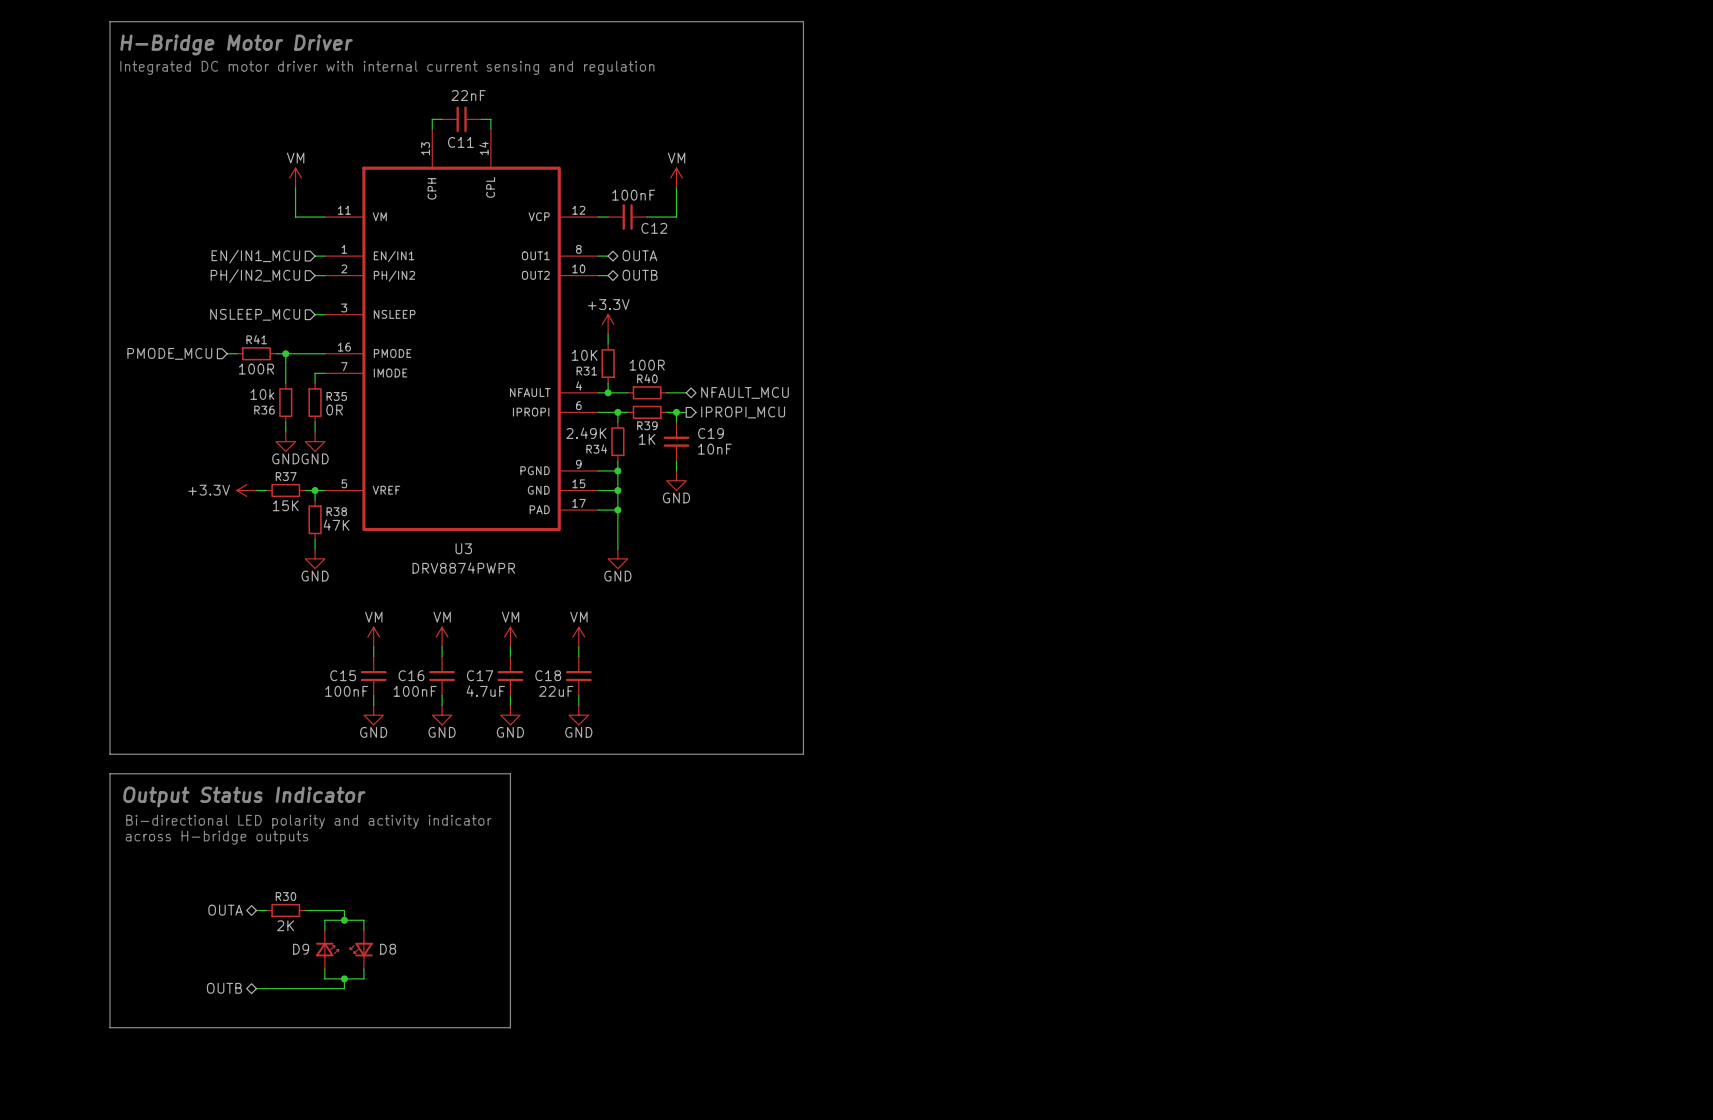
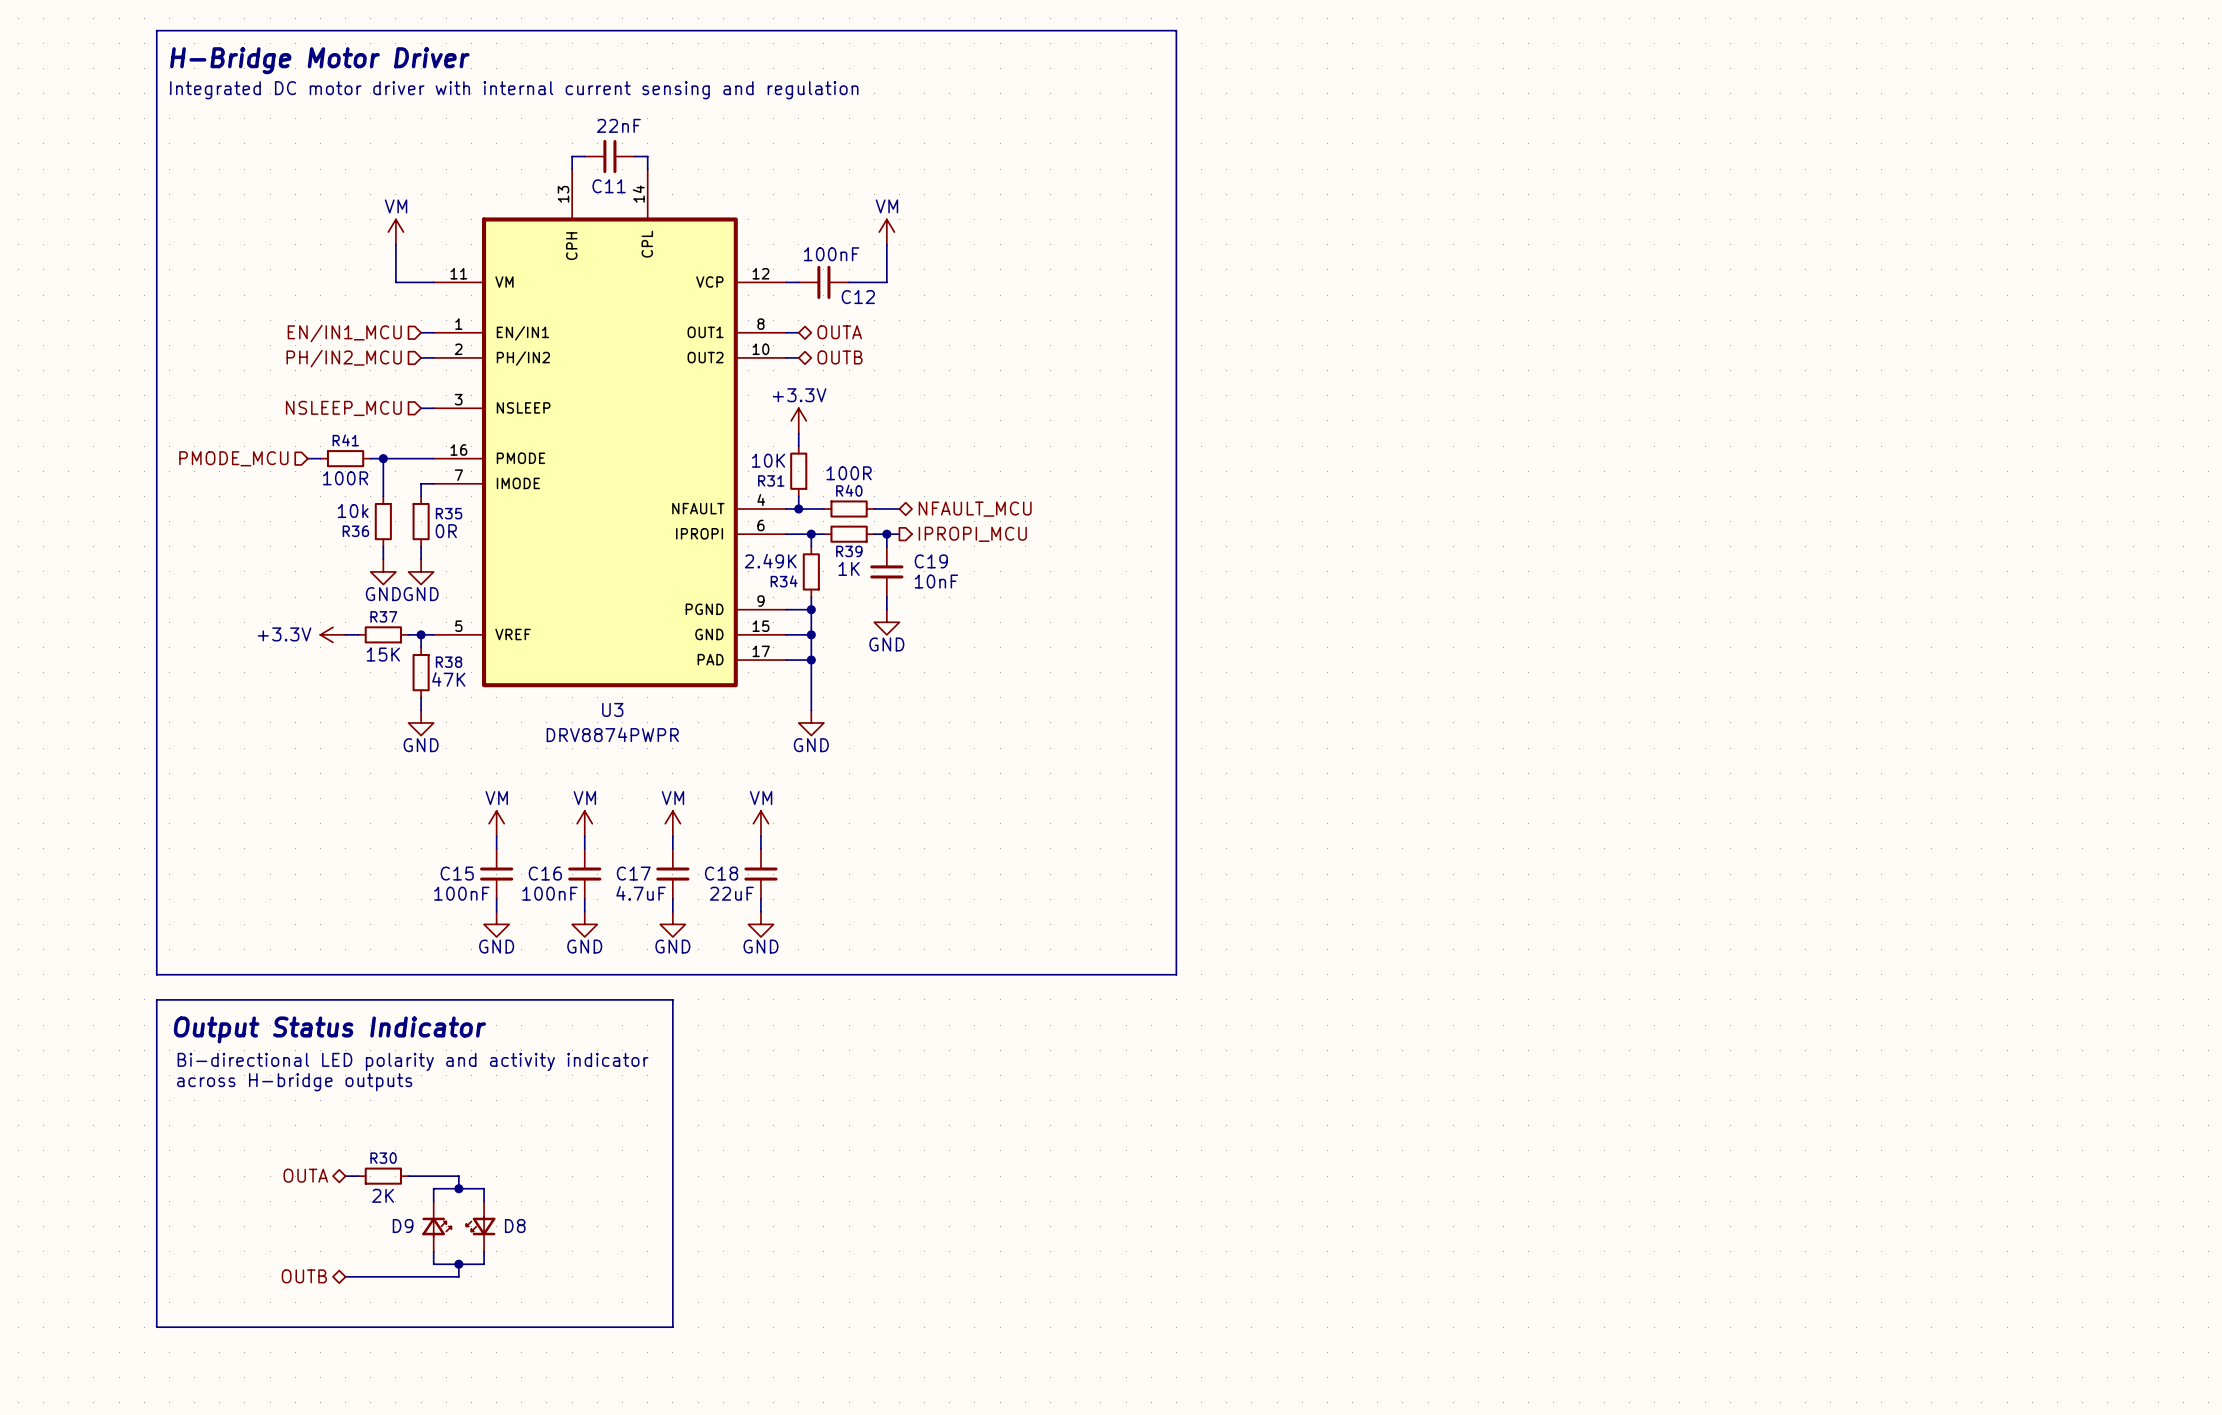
line: (803, 21) (803, 754) -> (1050, 30) (1176, 30) (1176, 974) (1050, 974)

